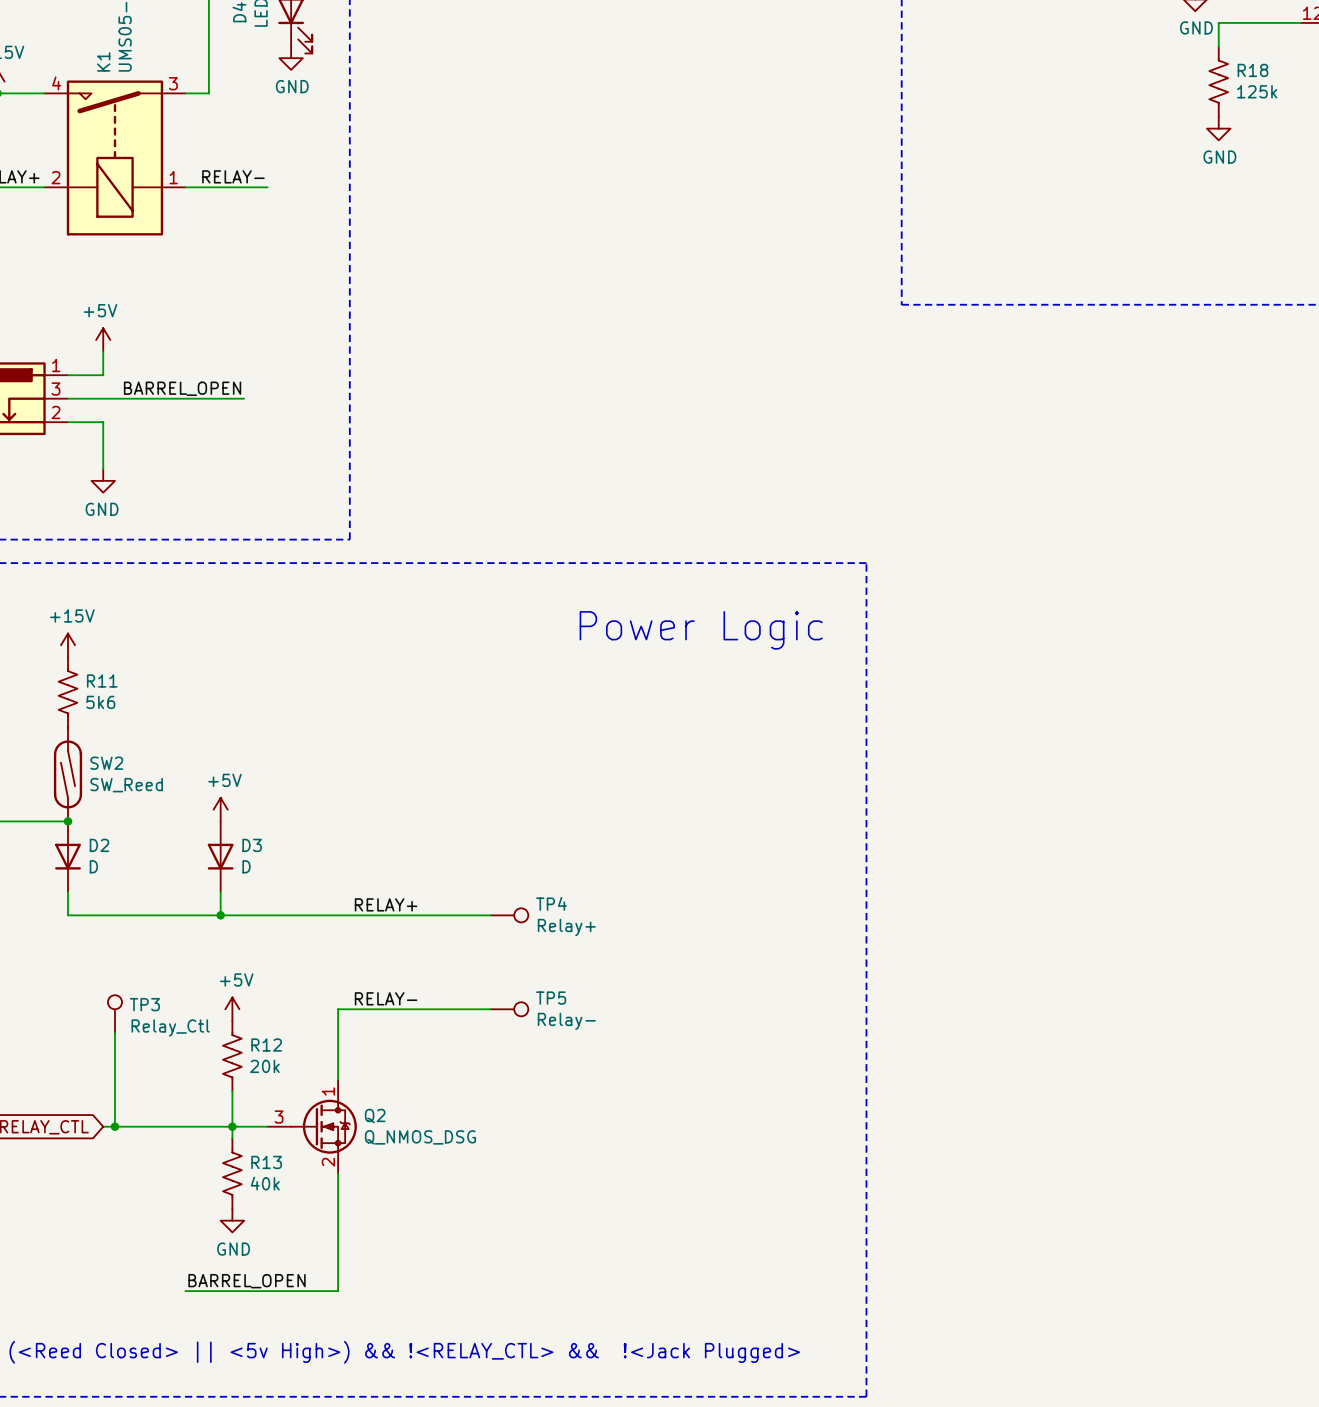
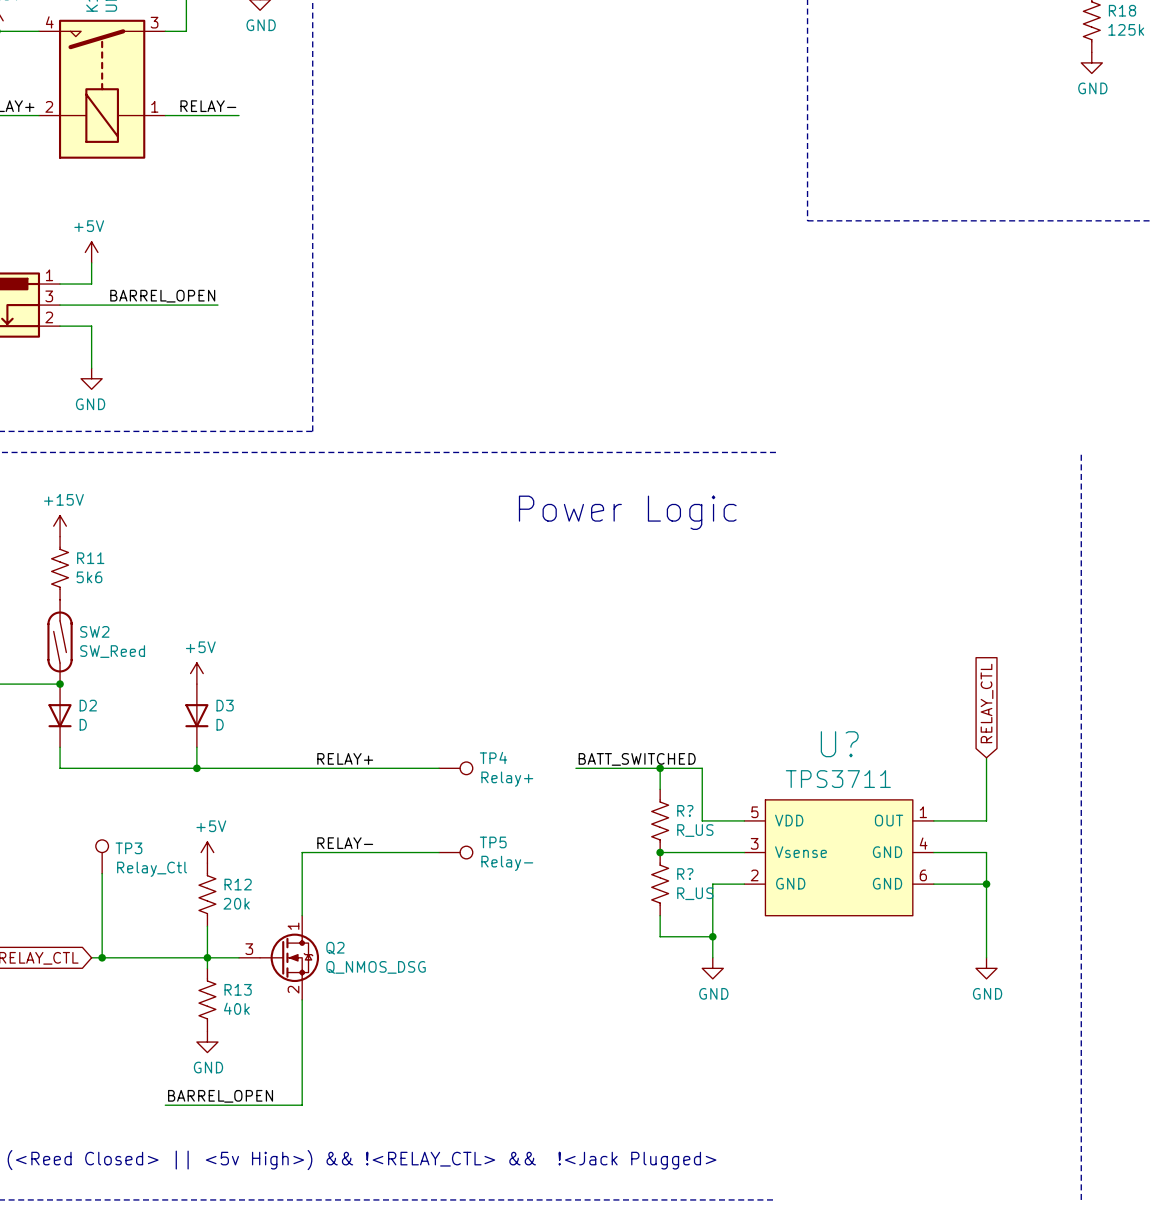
line: (866, 563) (866, 1396) -> none
line: none -> (1081, 452) (1081, 1199)
global label: none -> RELAY_CTL (987, 703)
wire: none -> (986, 757) (986, 820) (933, 820)
label: none -> BATT_SWITCHED (637, 759)
wire: none -> (575, 768) (702, 768) (702, 820) (744, 820)
wire: none -> (660, 768) (660, 789)
junction: none -> (660, 768)
R?: none -> R_US (660, 820)
wire: none -> (660, 852) (744, 852)
junction: none -> (660, 852)
wire: none -> (933, 852) (986, 852) (986, 957)
U?: none -> TPS3711 (839, 857)
R?: none -> R_US (660, 884)
wire: none -> (744, 884) (712, 884) (712, 957)
wire: none -> (933, 884) (986, 884)
junction: none -> (986, 884)
wire: none -> (660, 915) (660, 936) (712, 936)
junction: none -> (712, 936)
power symbol: none -> GND (712, 968)
power symbol: none -> GND (986, 968)

